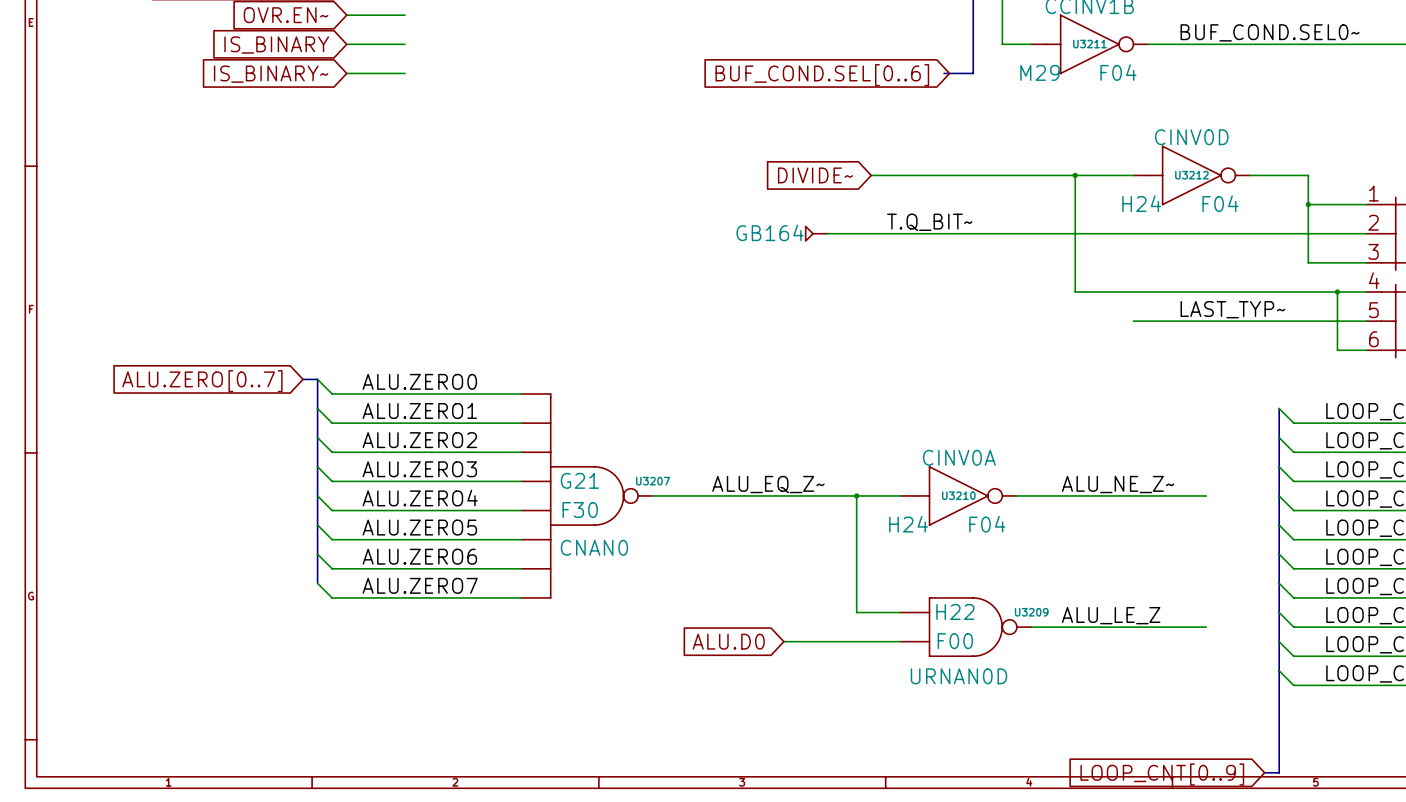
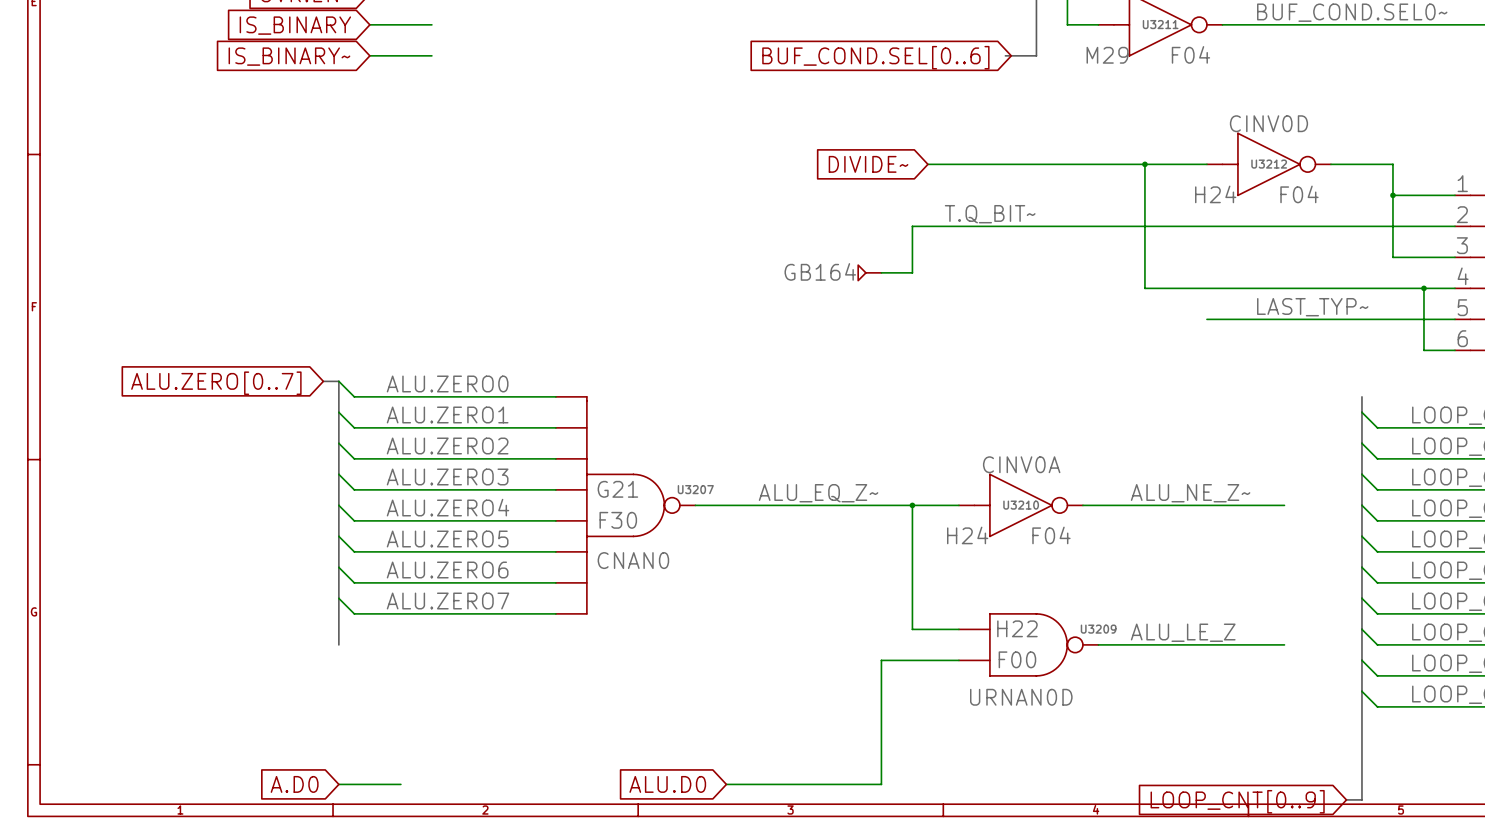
GB164 position: (816, 233) -> (869, 272)
wire: (827, 233) (856, 233) -> (881, 272) (912, 272) (912, 226)
bus: none -> (1361, 396) (1361, 412)
bus: none -> (338, 598) (338, 644)
global label: ALU.D0 (728, 641) -> none
wire: (783, 641) (827, 641) -> (726, 784) (881, 784) (881, 660)
global label: none -> A.D0 (294, 784)
wire: none -> (338, 784) (400, 784)
global label: none -> ALU.D0 (667, 784)

